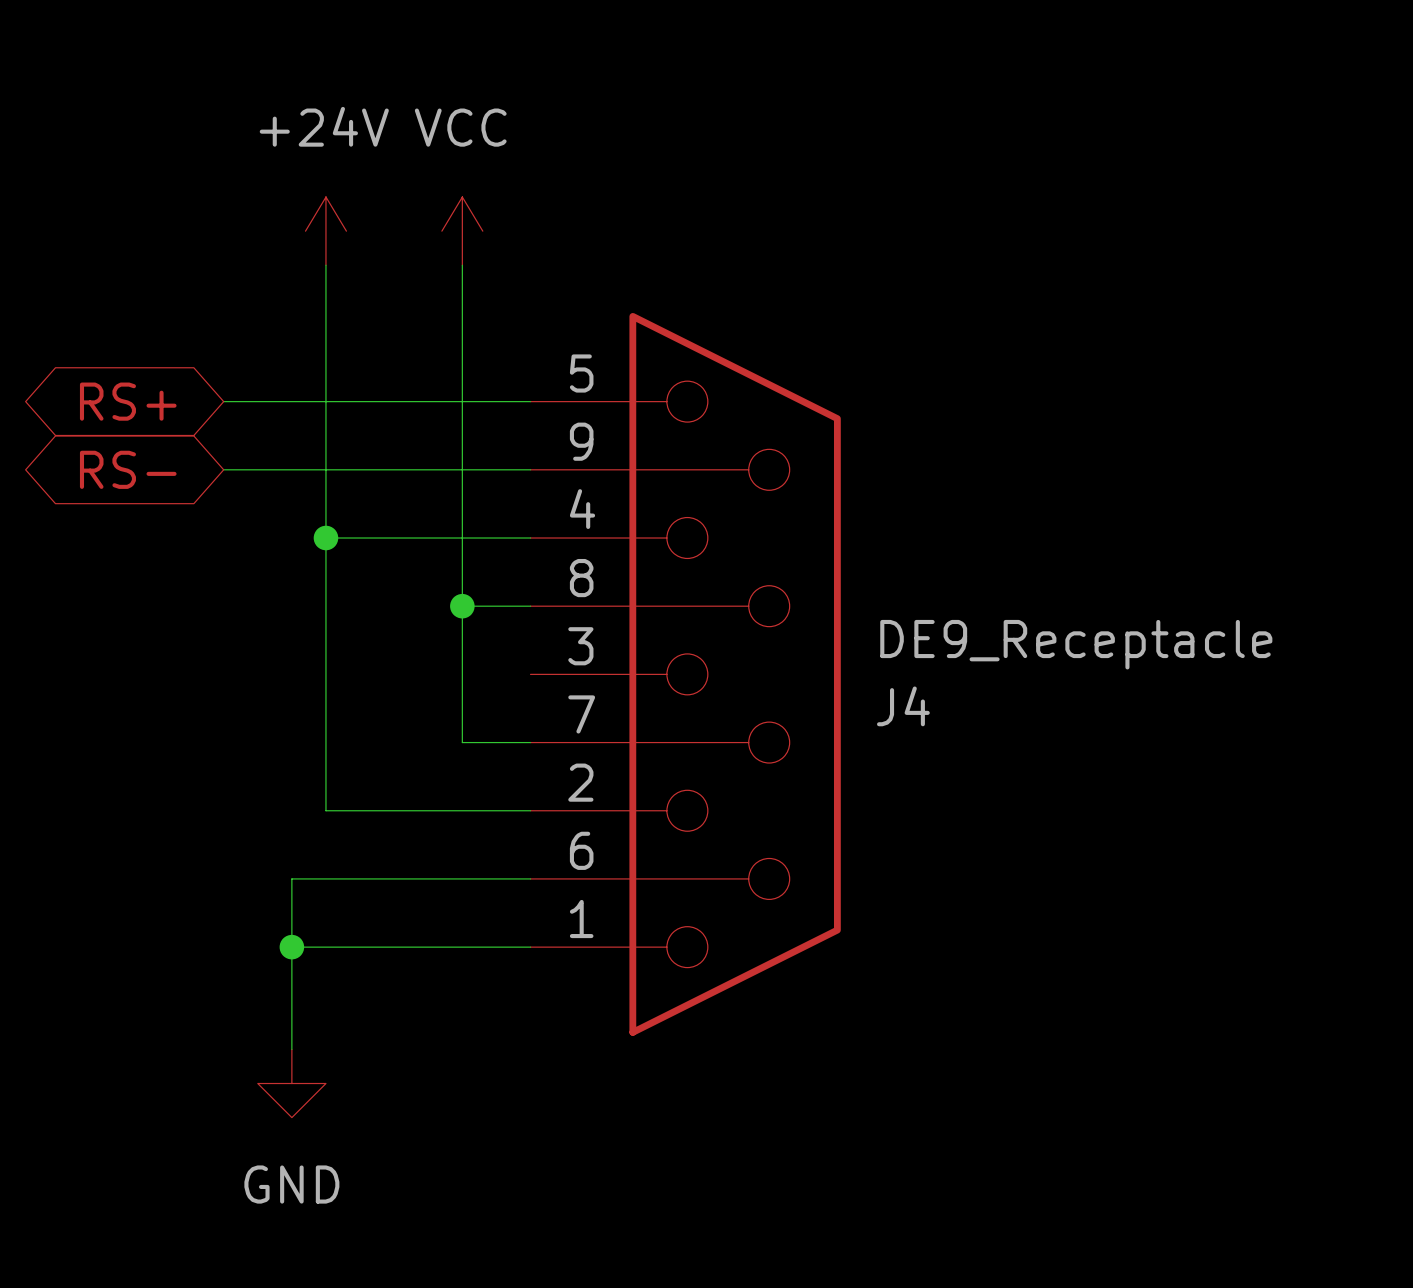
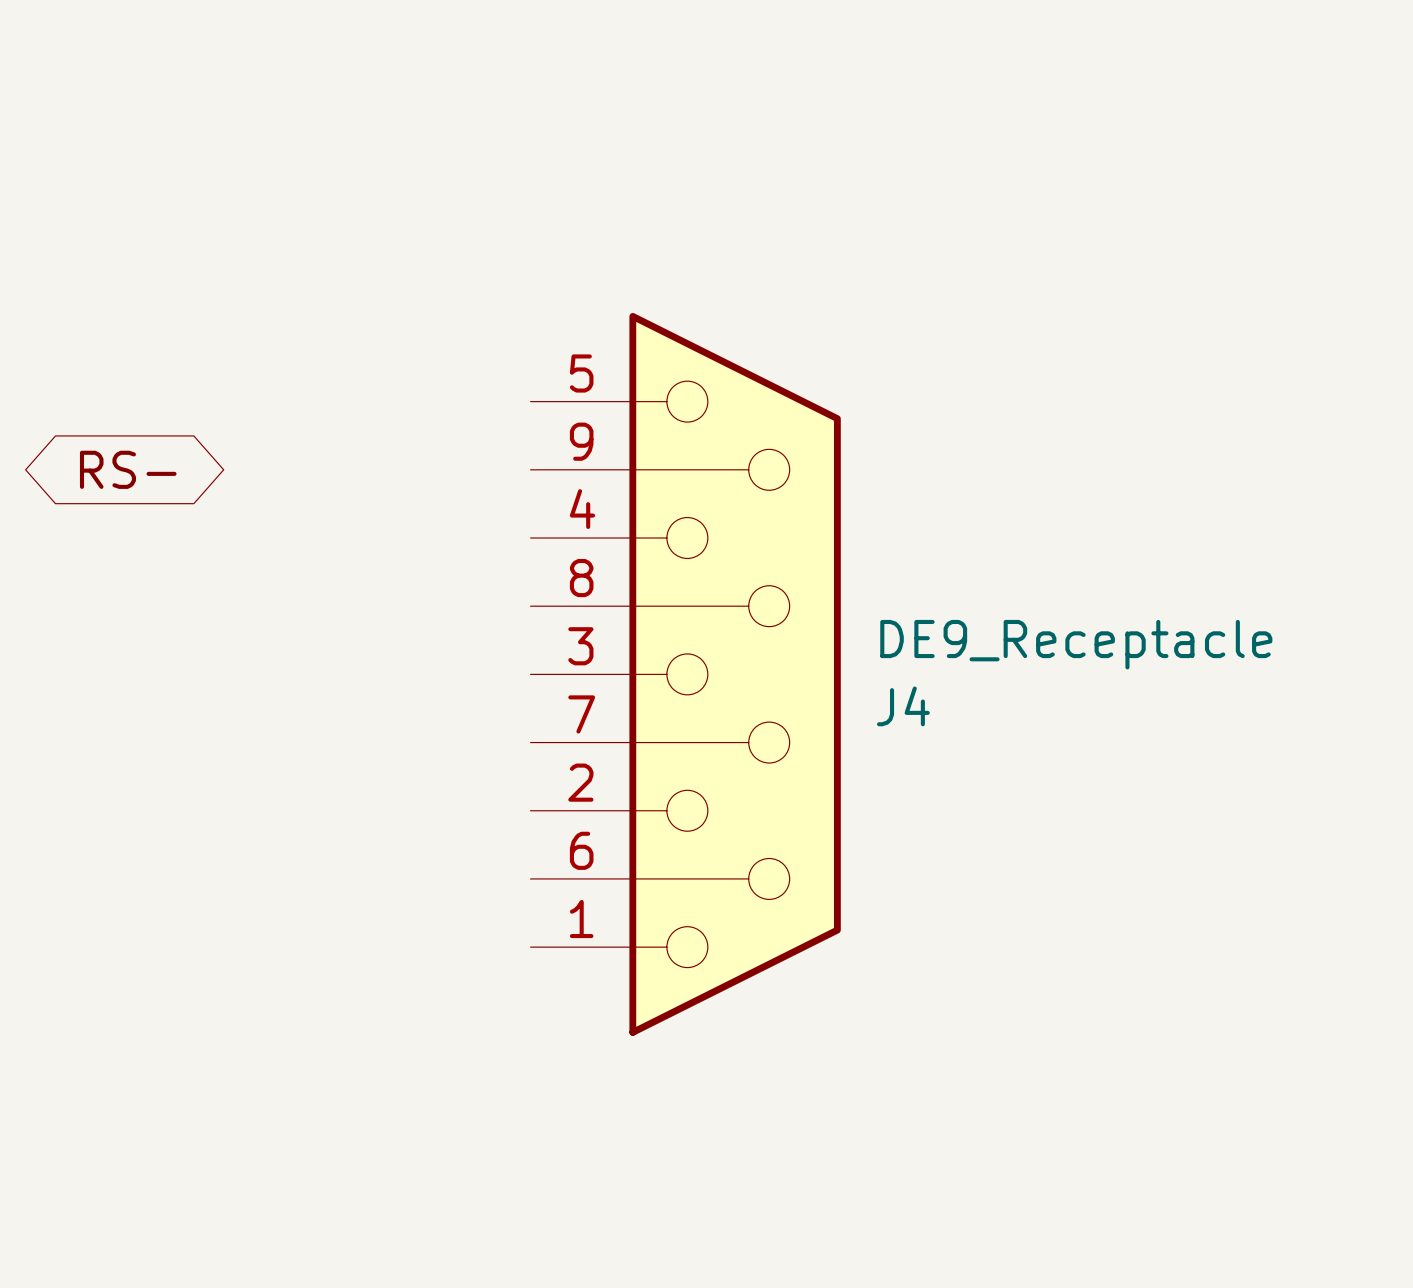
power symbol: +24V (325, 231) -> none
power symbol: VCC (462, 231) -> none
wire: (325, 265) (325, 810) (530, 810) -> none
wire: (462, 265) (462, 742) (530, 742) -> none
global label: RS+ (128, 401) -> none
wire: (223, 401) (530, 401) -> none
wire: (223, 469) (530, 469) -> none
wire: (325, 538) (530, 538) -> none
junction: (325, 538) -> none
wire: (462, 606) (530, 606) -> none
junction: (462, 606) -> none
wire: (530, 878) (291, 878) (291, 1049) -> none
wire: (291, 947) (530, 947) -> none
junction: (291, 947) -> none
power symbol: GND (291, 1083) -> none

